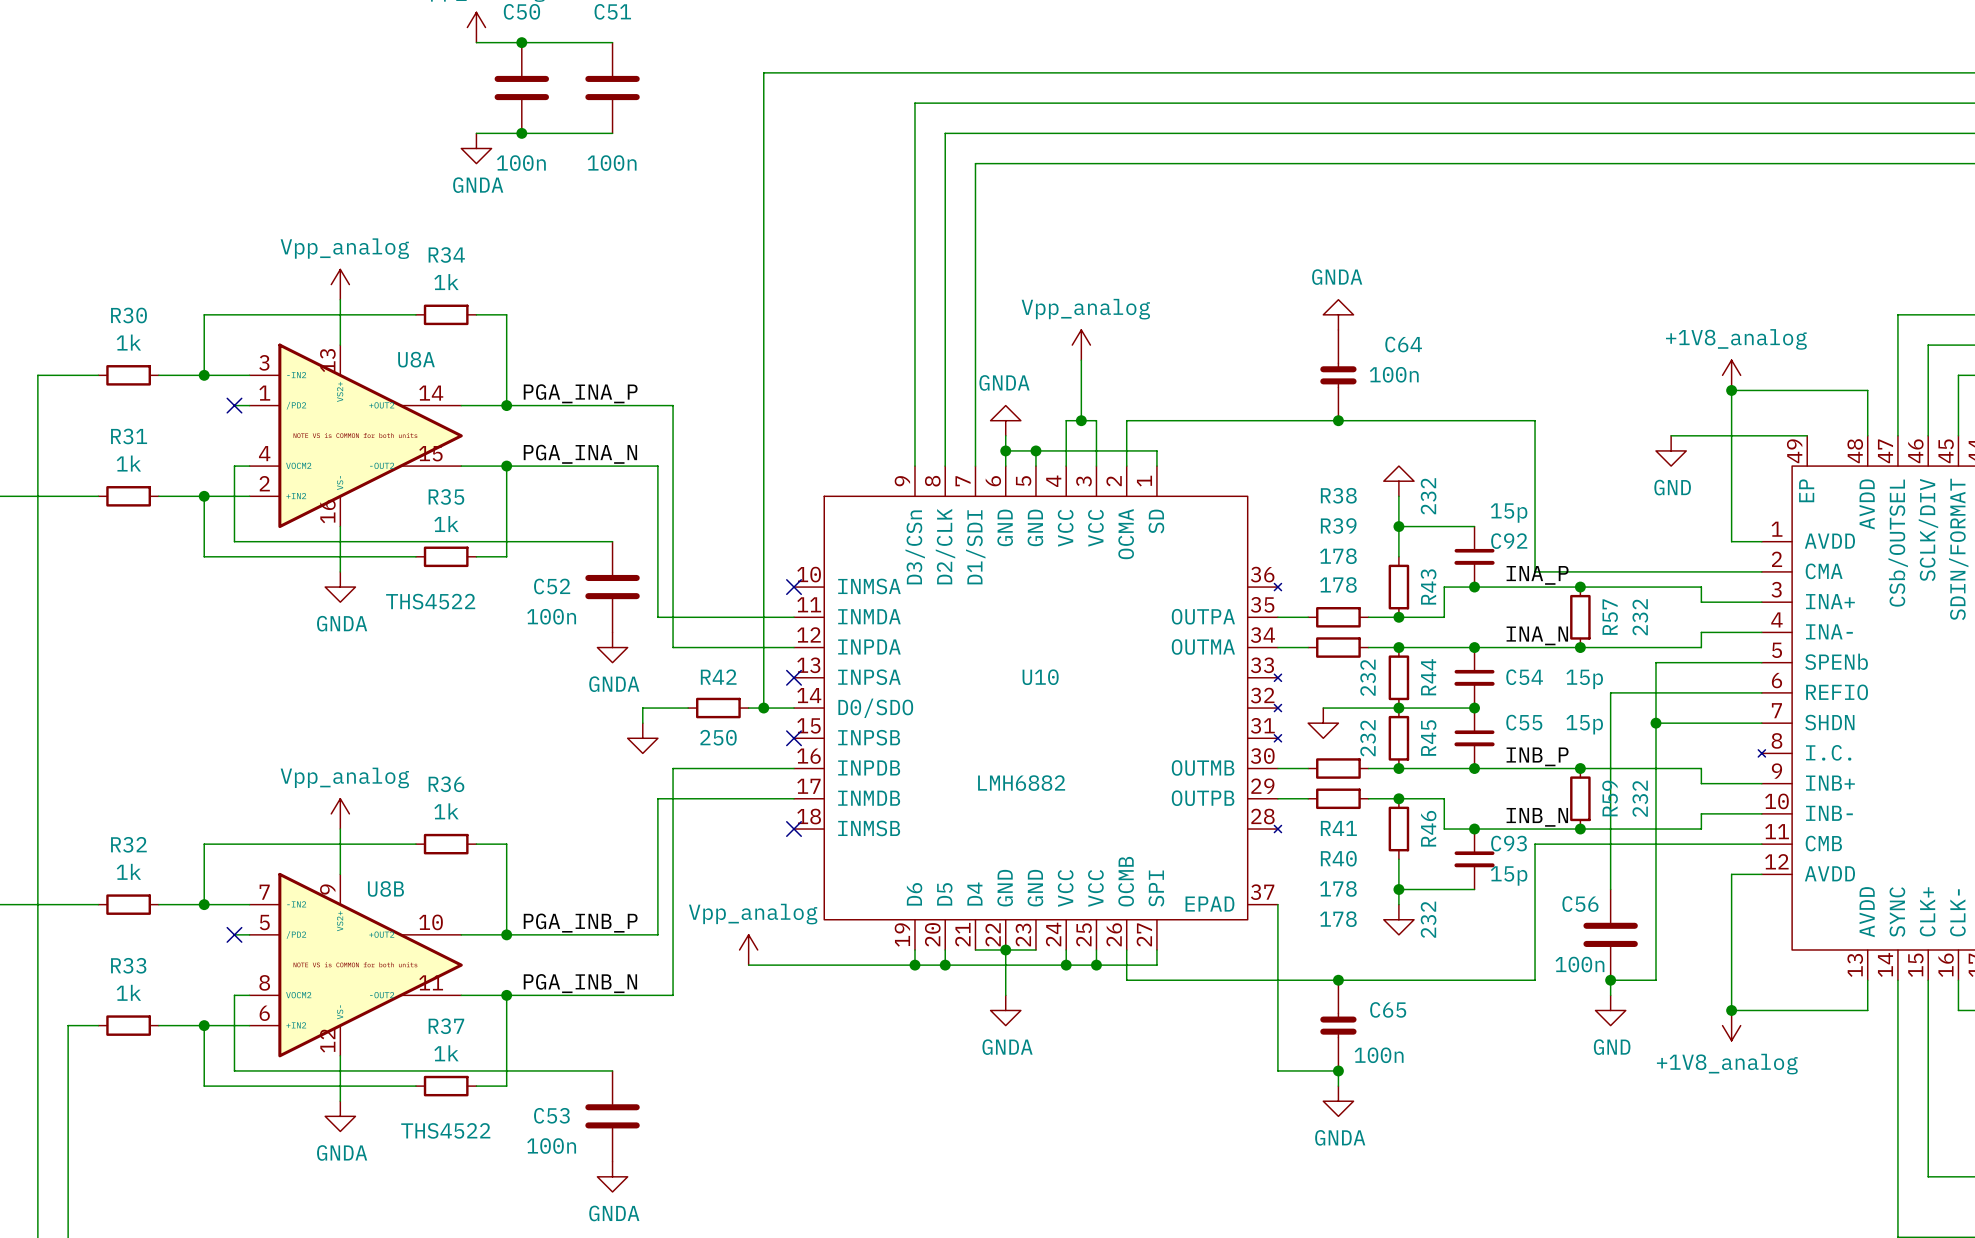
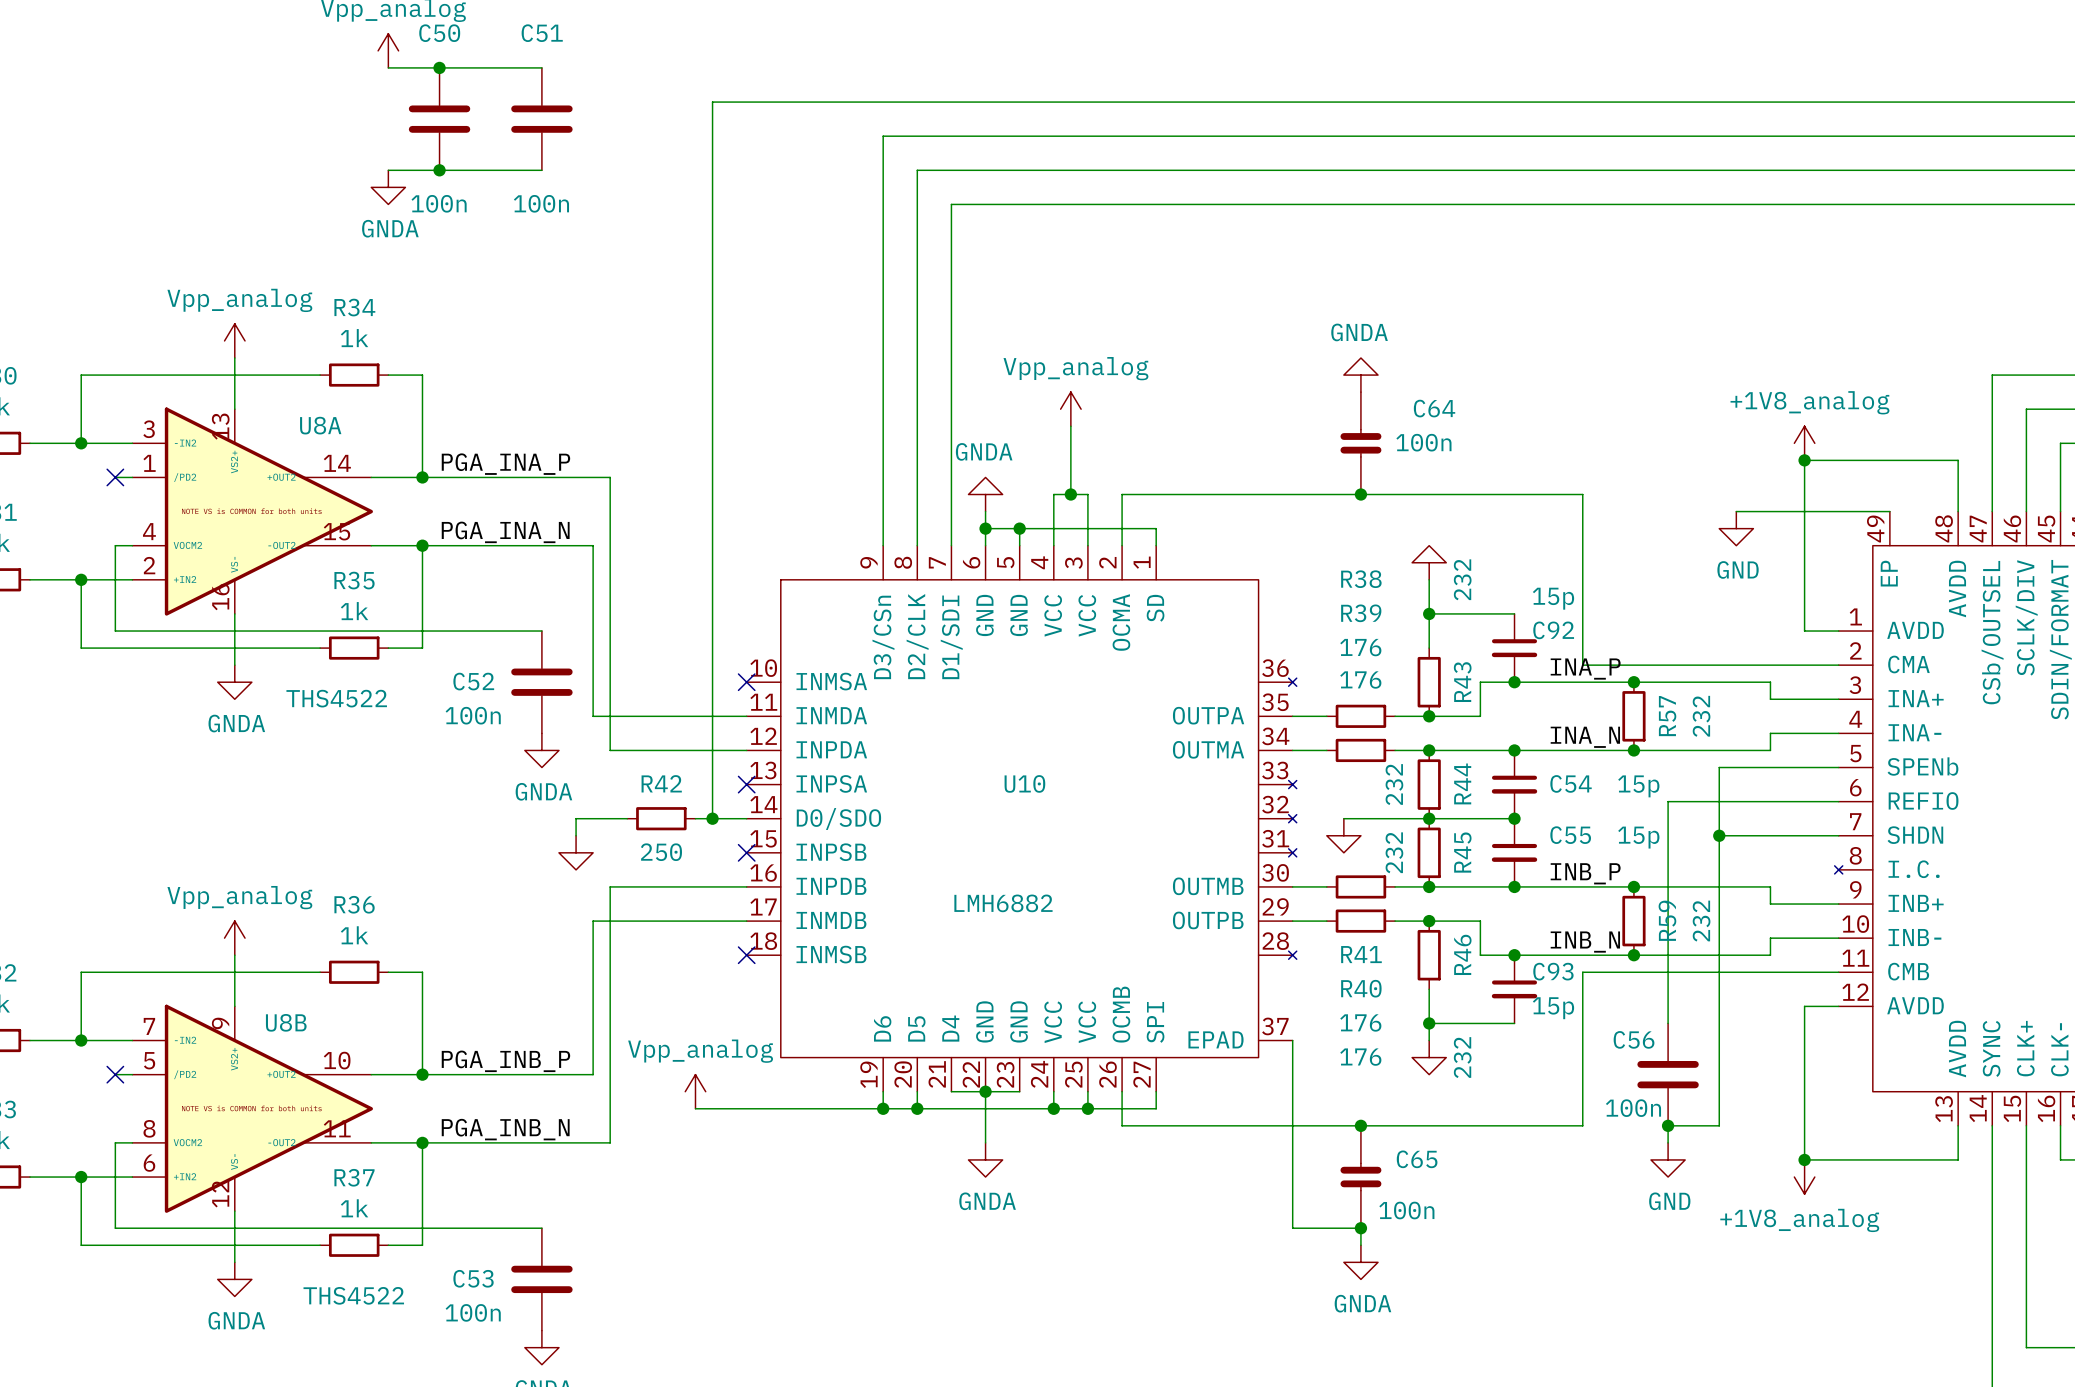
R39 value: 178 (1338, 556) -> 176 (1360, 647)
R38 value: 178 (1338, 584) -> 176 (1360, 680)
R41 value: 178 (1338, 888) -> 176 (1360, 1022)
R40 value: 178 (1338, 919) -> 176 (1360, 1057)

